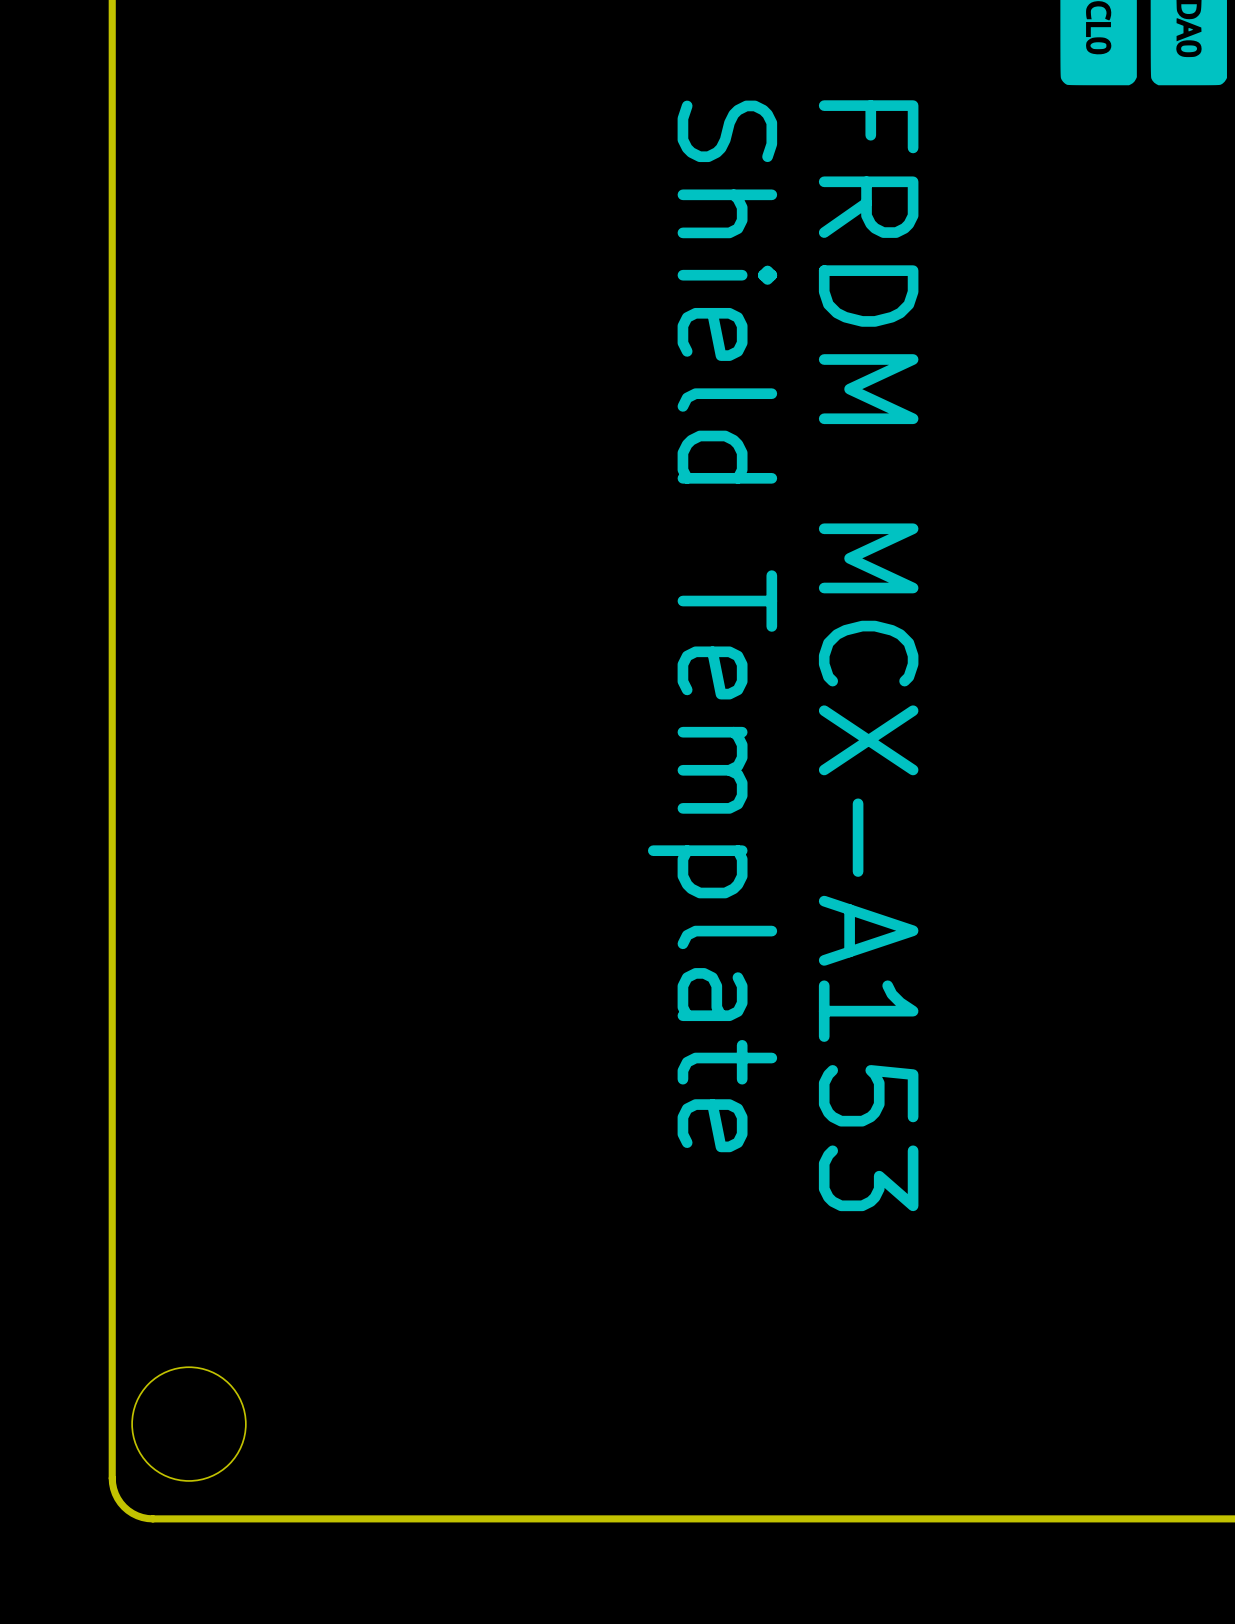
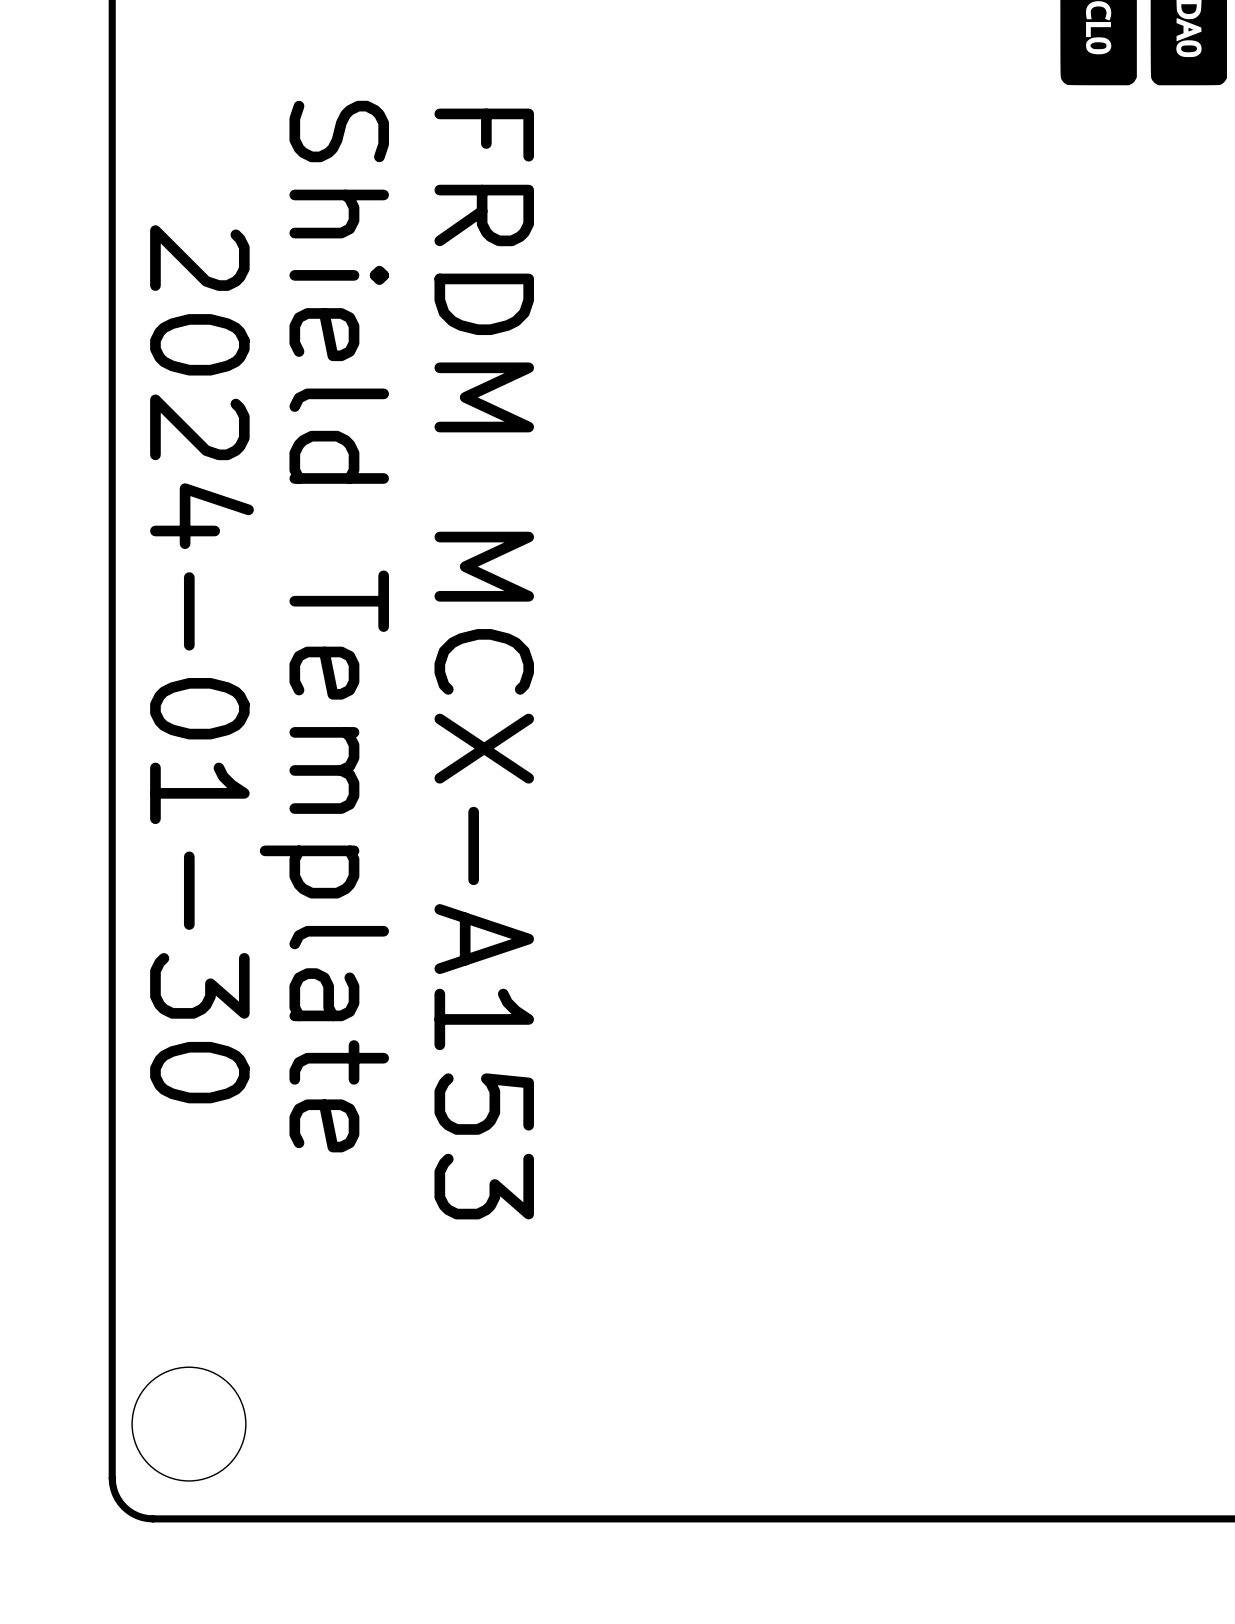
text position: Shield Template (712, 626) -> Shield Template (324, 626)
text position: FRDM MCX-A153 (868, 655) -> FRDM MCX-A153 (484, 664)
text: none -> 2024-01-30 (202, 664)

